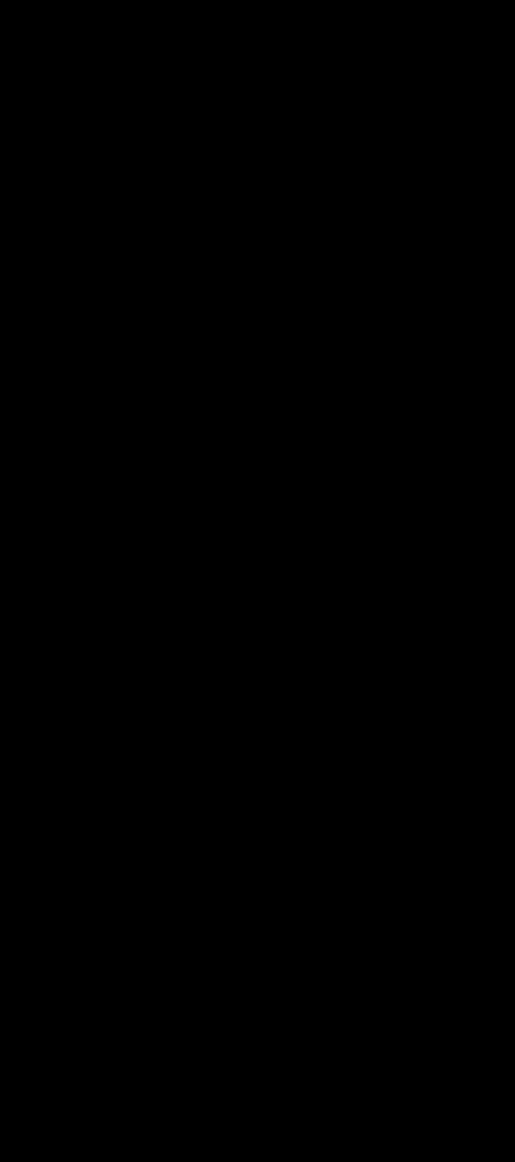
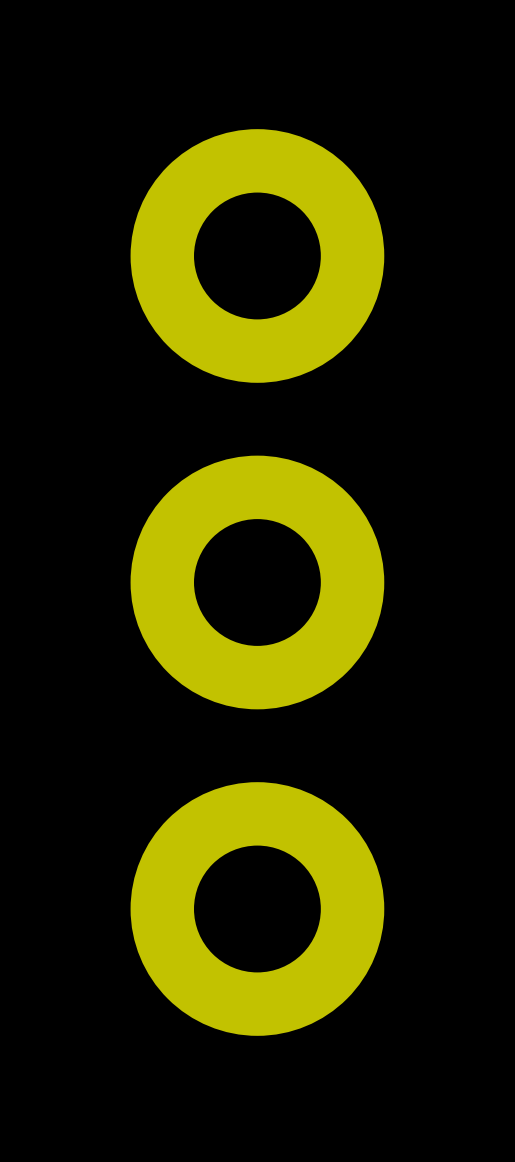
part: none -> (257, 255)
part: none -> (257, 582)
part: none -> (257, 909)

